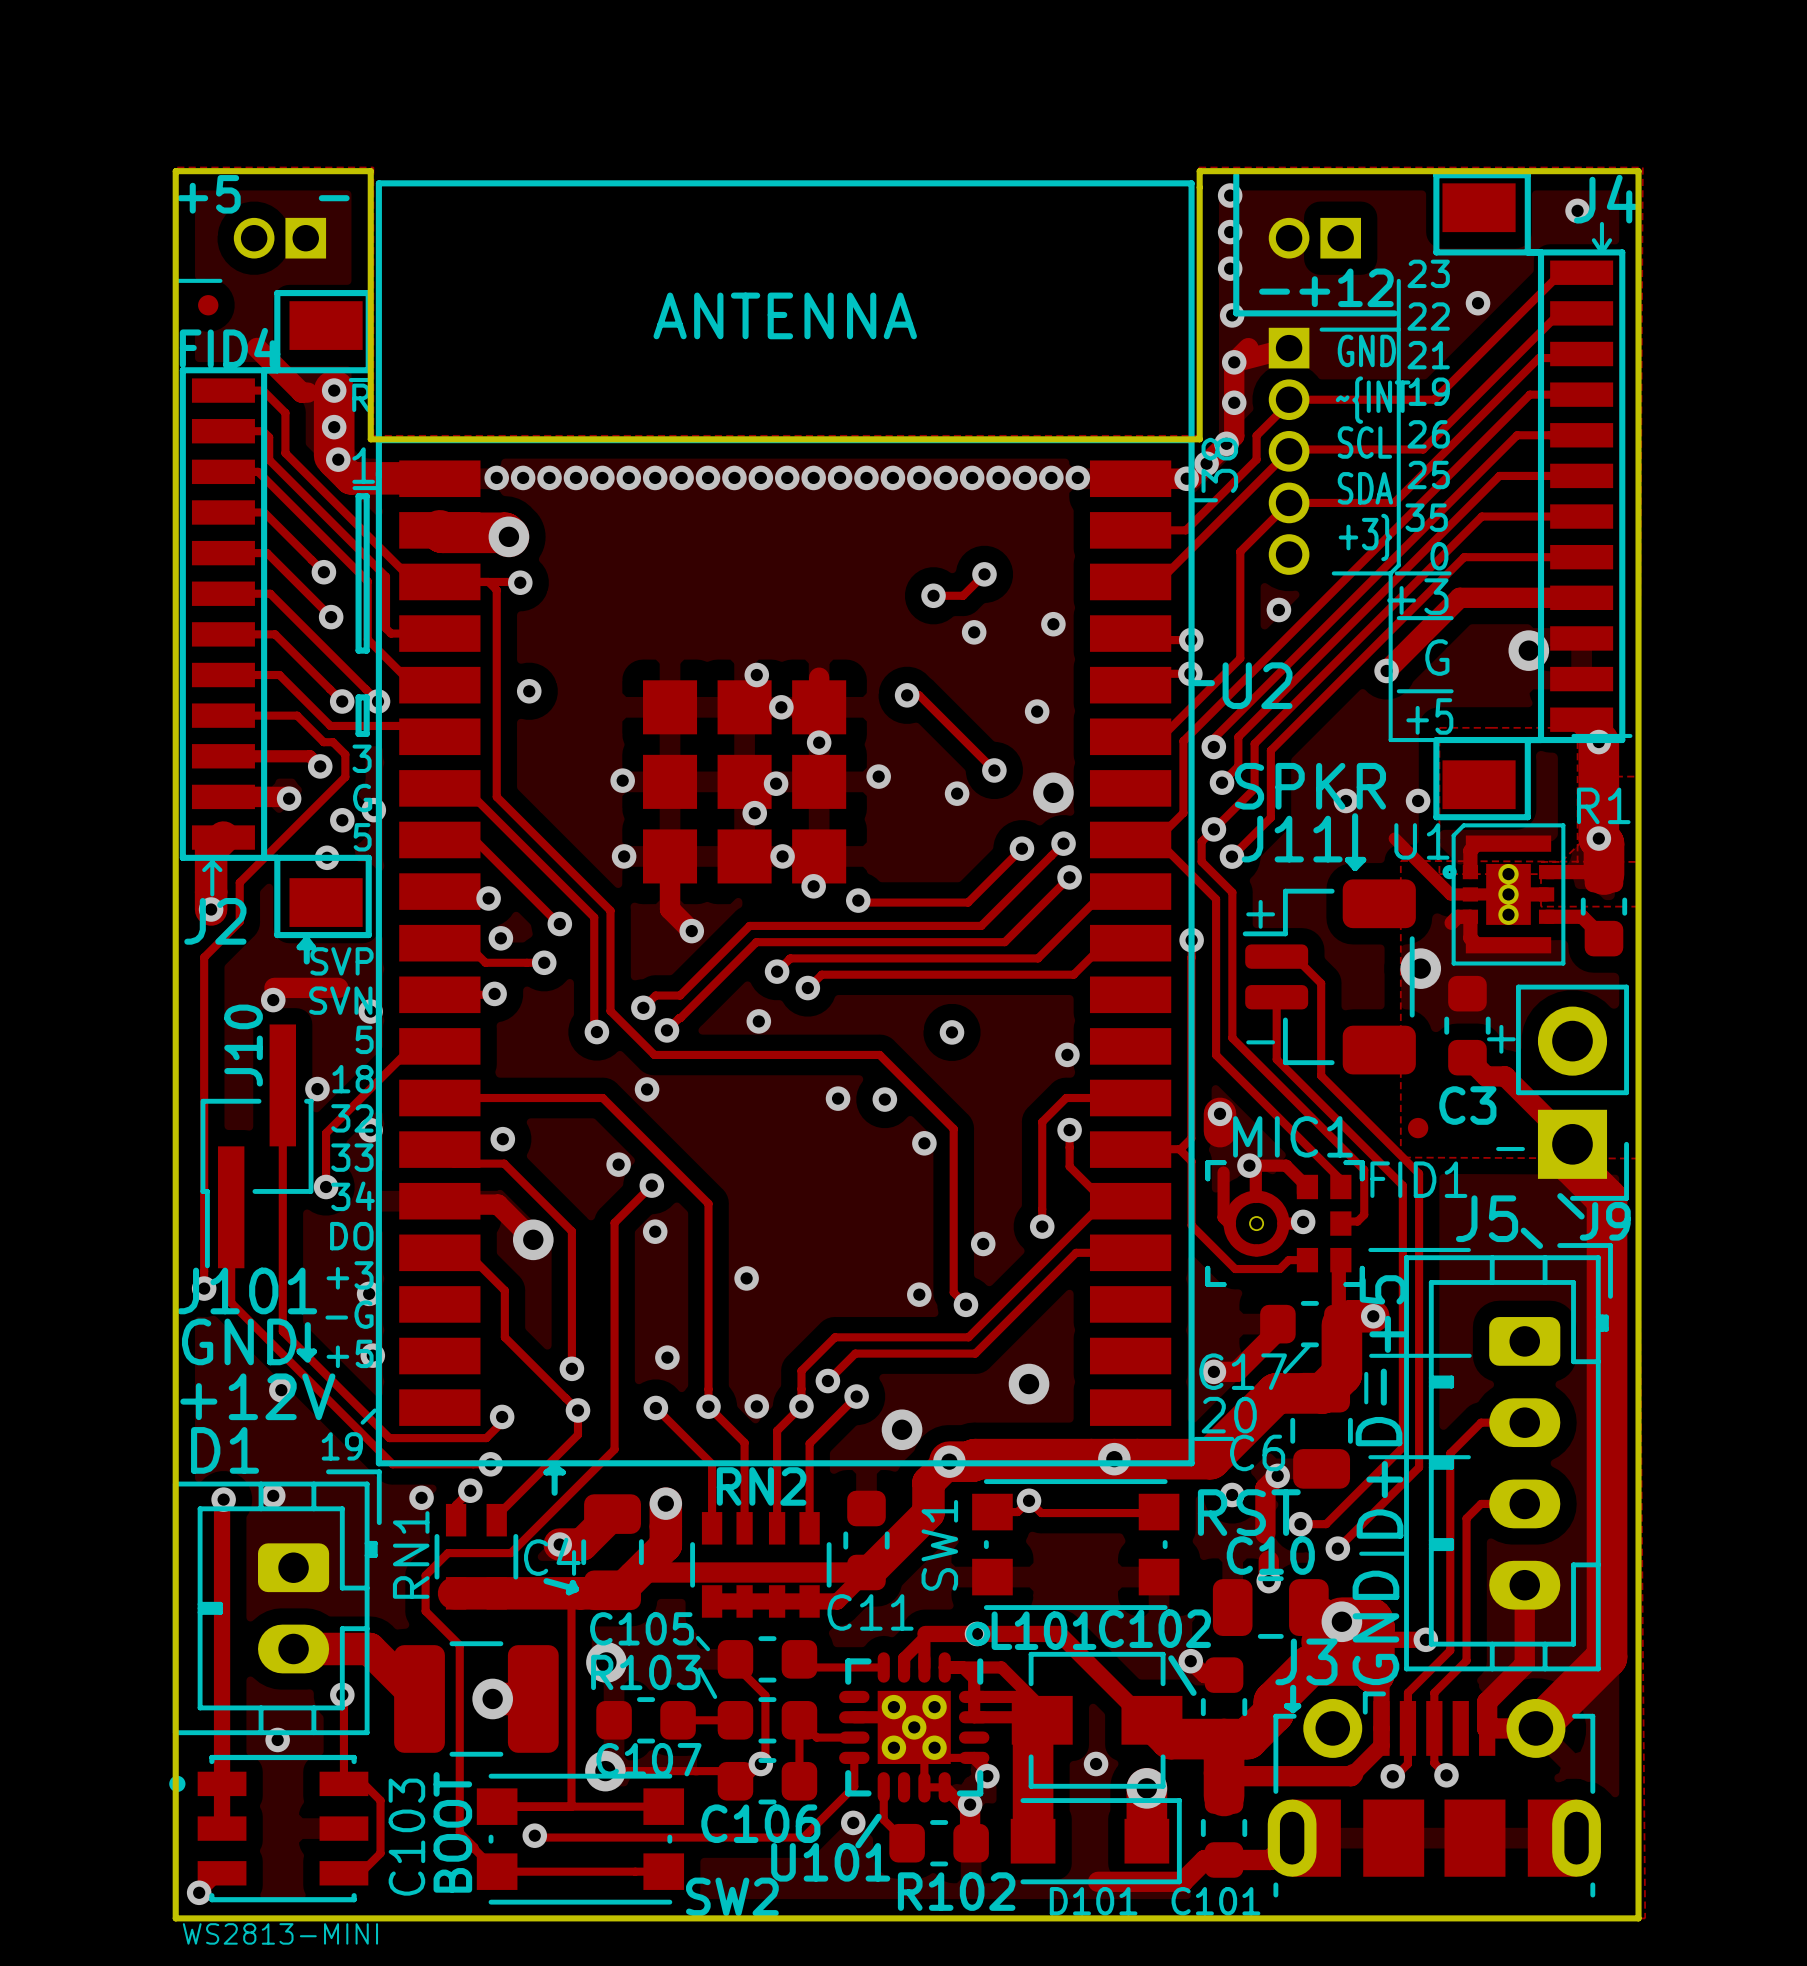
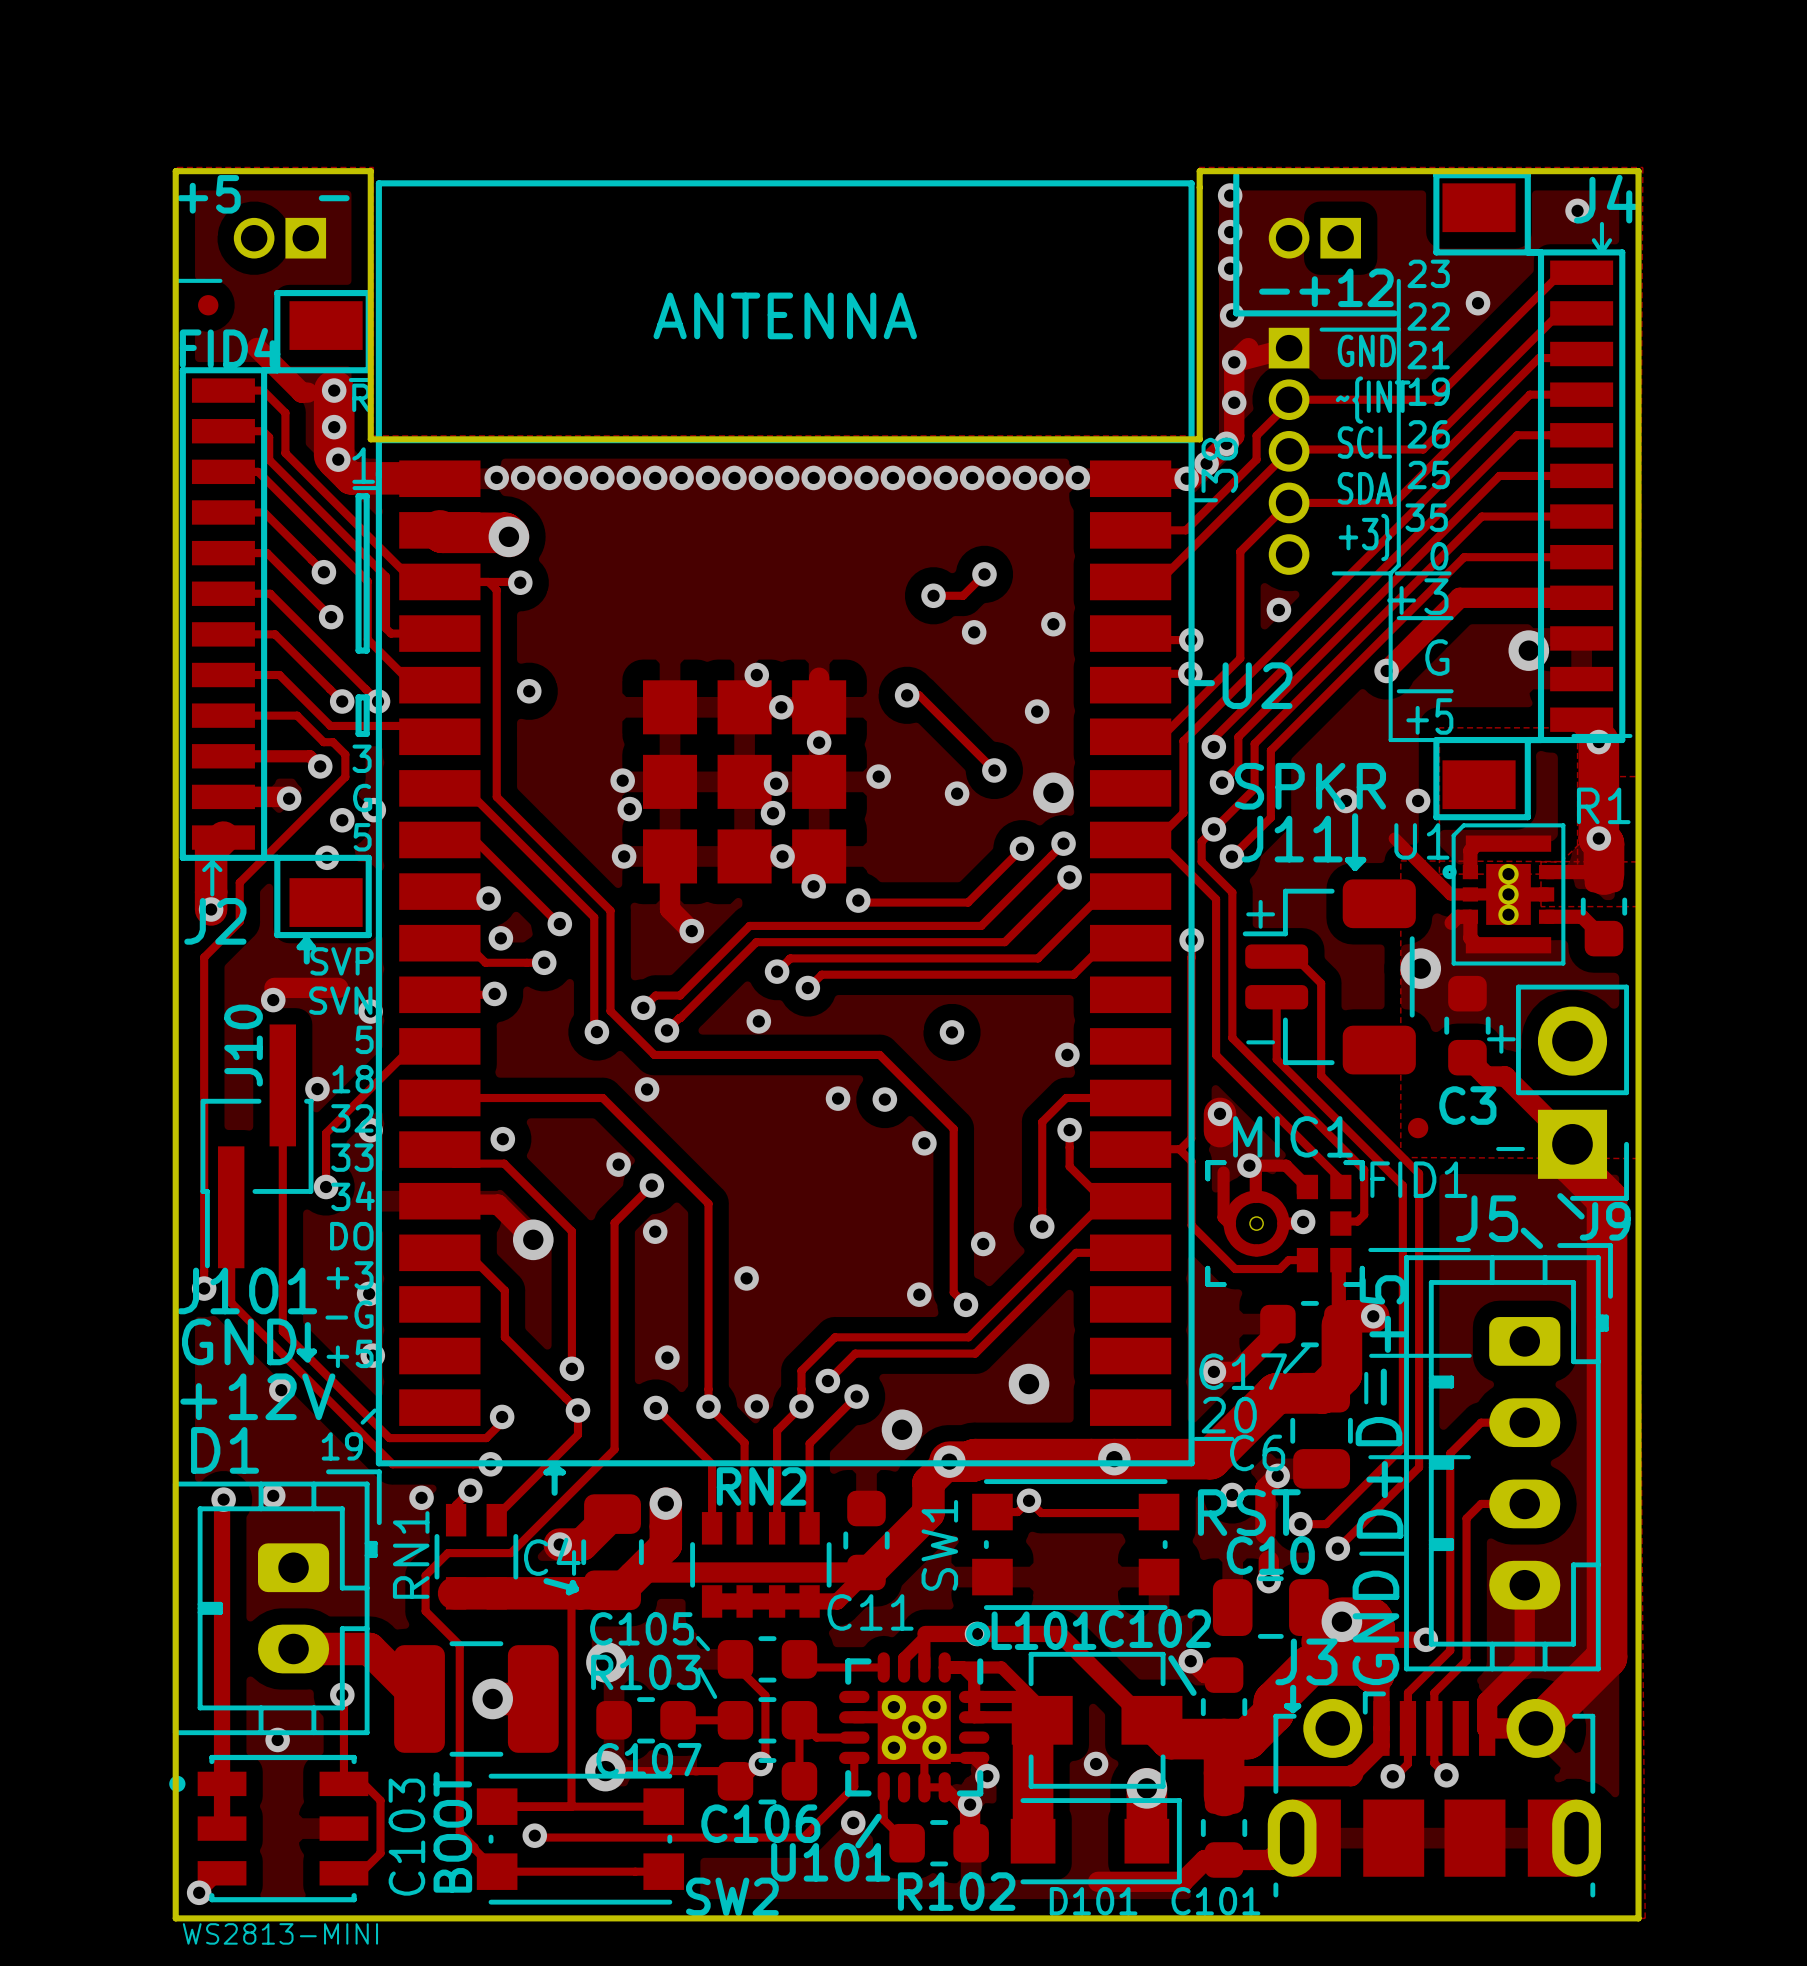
via: none -> (629, 809)
via position: (754, 813) -> (773, 813)

